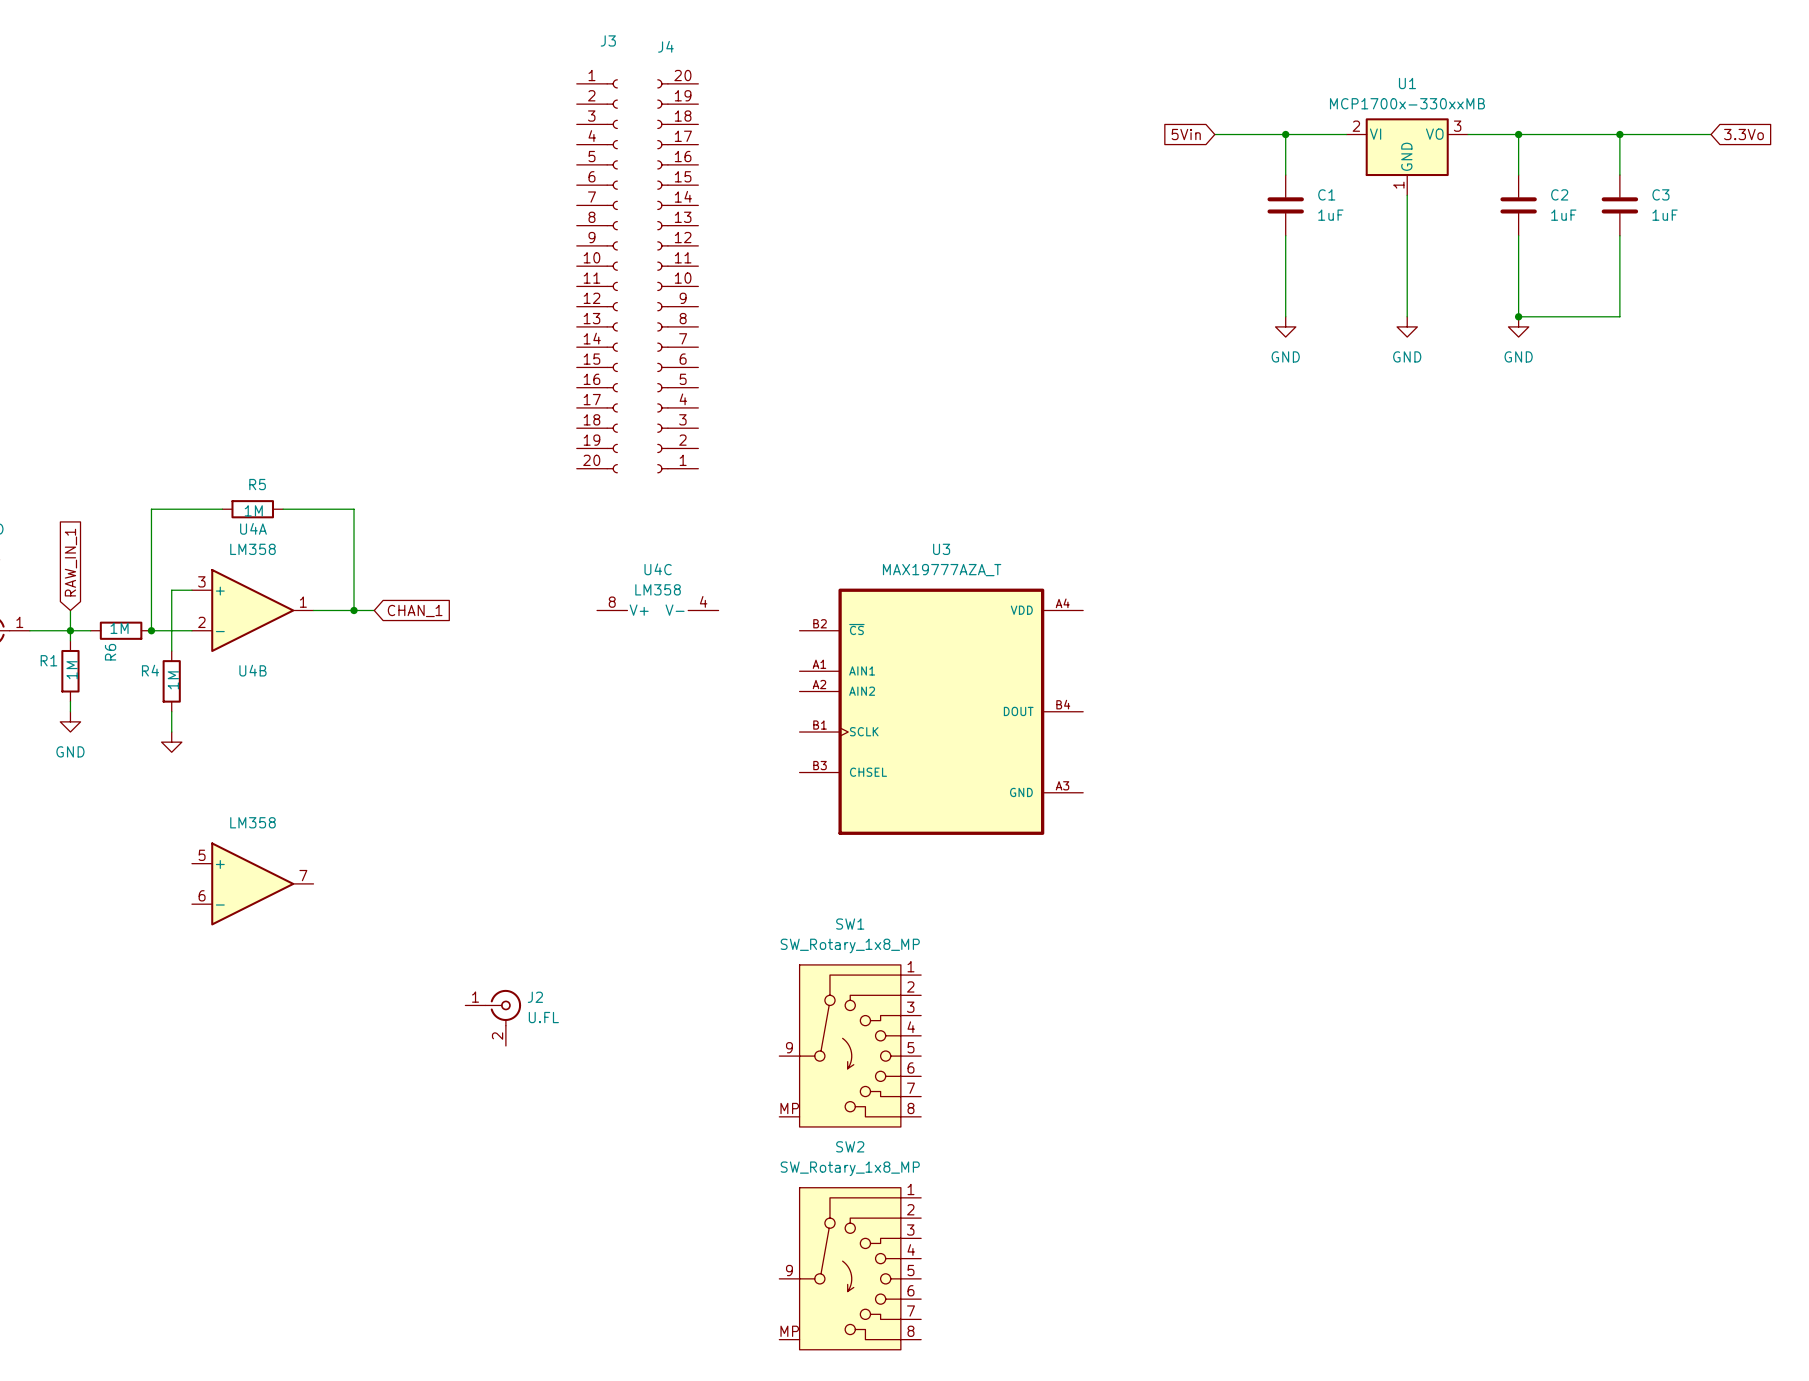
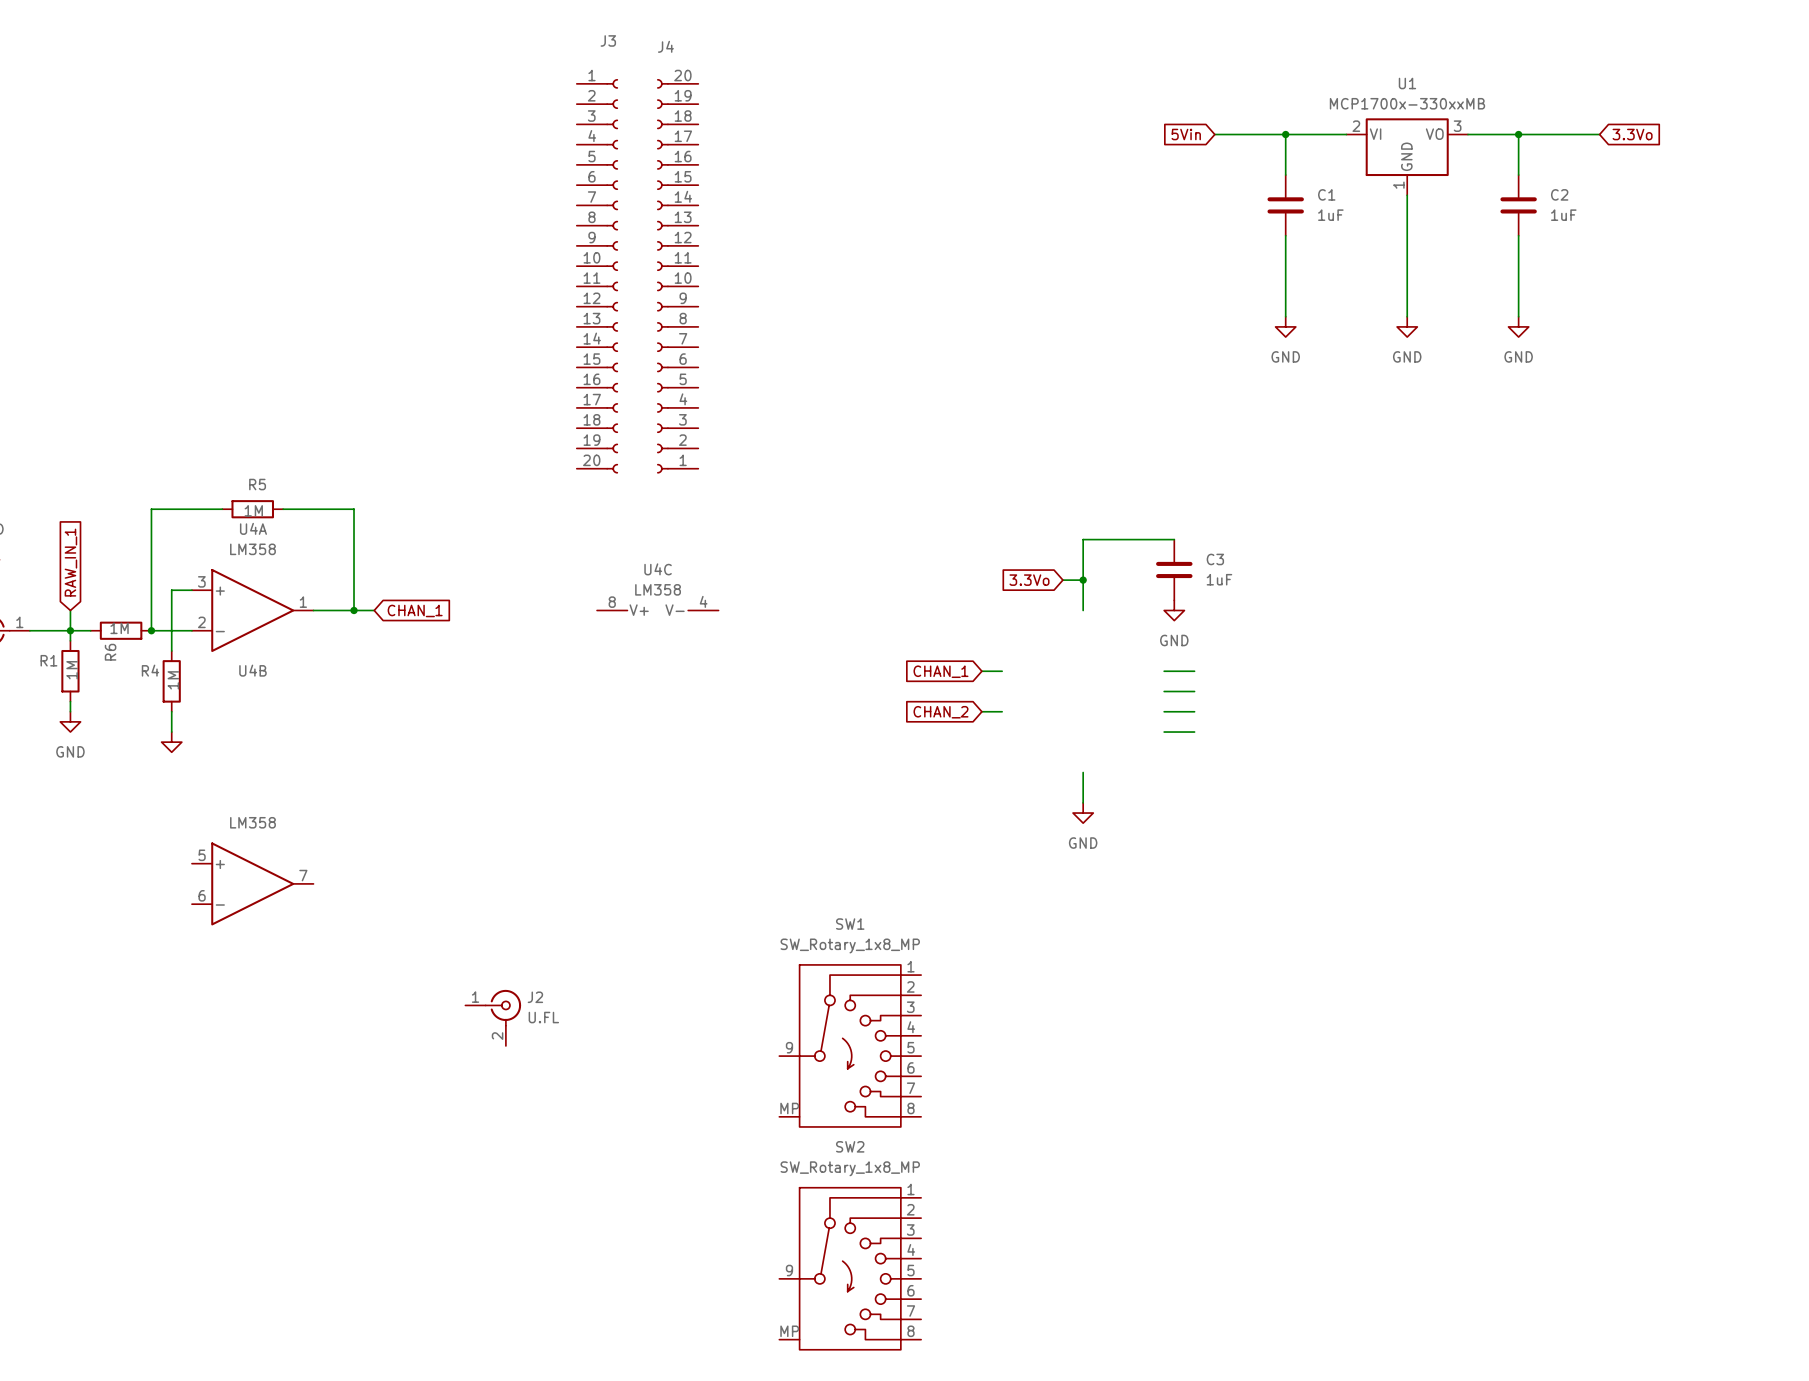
wire: (1599, 134) (1711, 134) -> none
wire: (1619, 134) (1619, 175) -> none
junction: (1619, 134) -> none
global label position: 3.3Vo (1743, 134) -> 3.3Vo (1632, 134)
C3 position: (1619, 205) -> (1174, 569)
wire: (1619, 235) (1619, 316) (1518, 316) -> none
junction: (1518, 316) -> none
wire: none -> (1174, 539) (1083, 539) (1083, 610)
global label: none -> 3.3Vo (1029, 580)
wire: none -> (1062, 580) (1083, 580)
junction: none -> (1083, 580)
power symbol: none -> GND (1174, 610)
global label: none -> CHAN_1 (941, 671)
wire: none -> (1164, 671) (1194, 671)
wire: none -> (1164, 691) (1194, 691)
U3: MAX19777AZA_T (941, 711) -> none
wire: none -> (1164, 711) (1194, 711)
global label: none -> CHAN_2 (941, 712)
wire: none -> (1164, 732) (1194, 732)
wire: none -> (1083, 772) (1083, 802)
power symbol: none -> GND (1083, 813)

